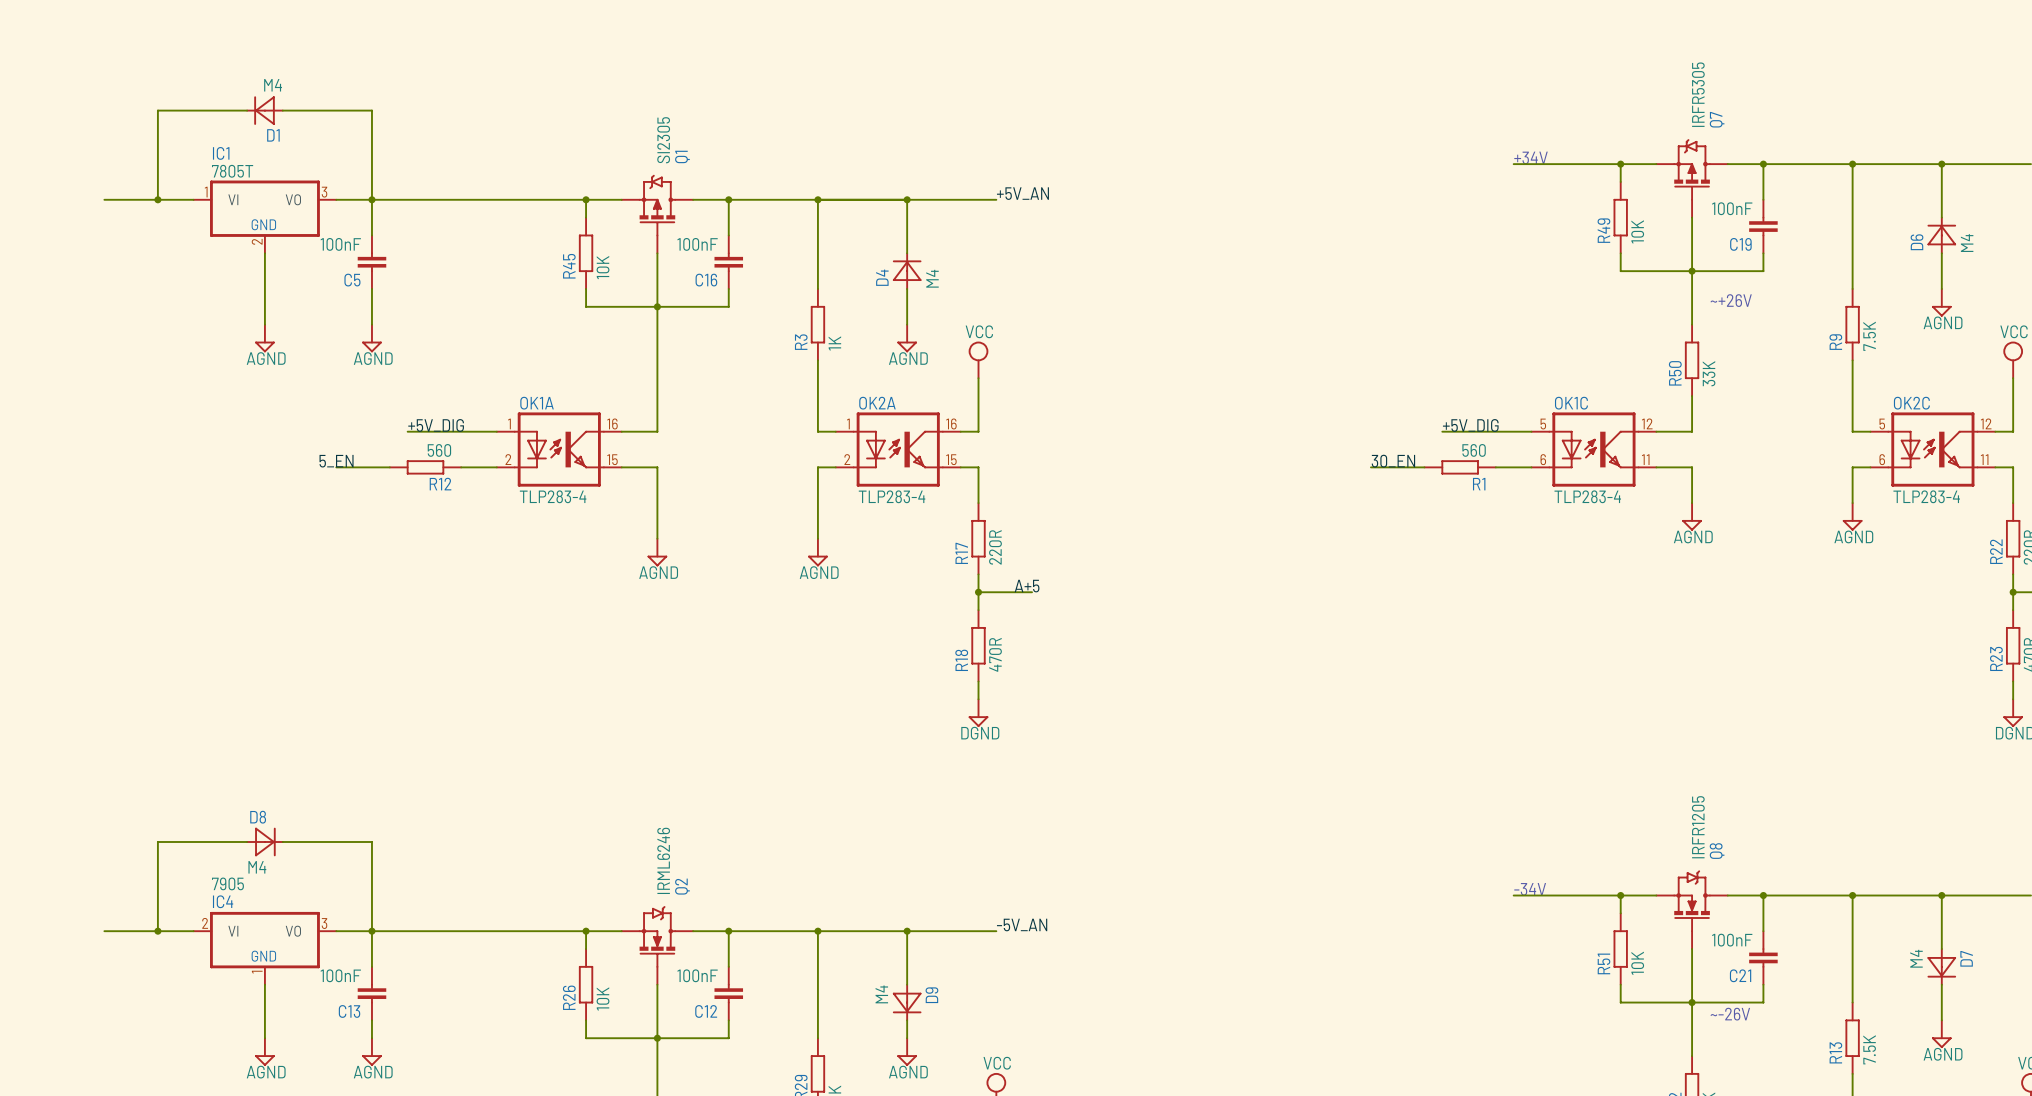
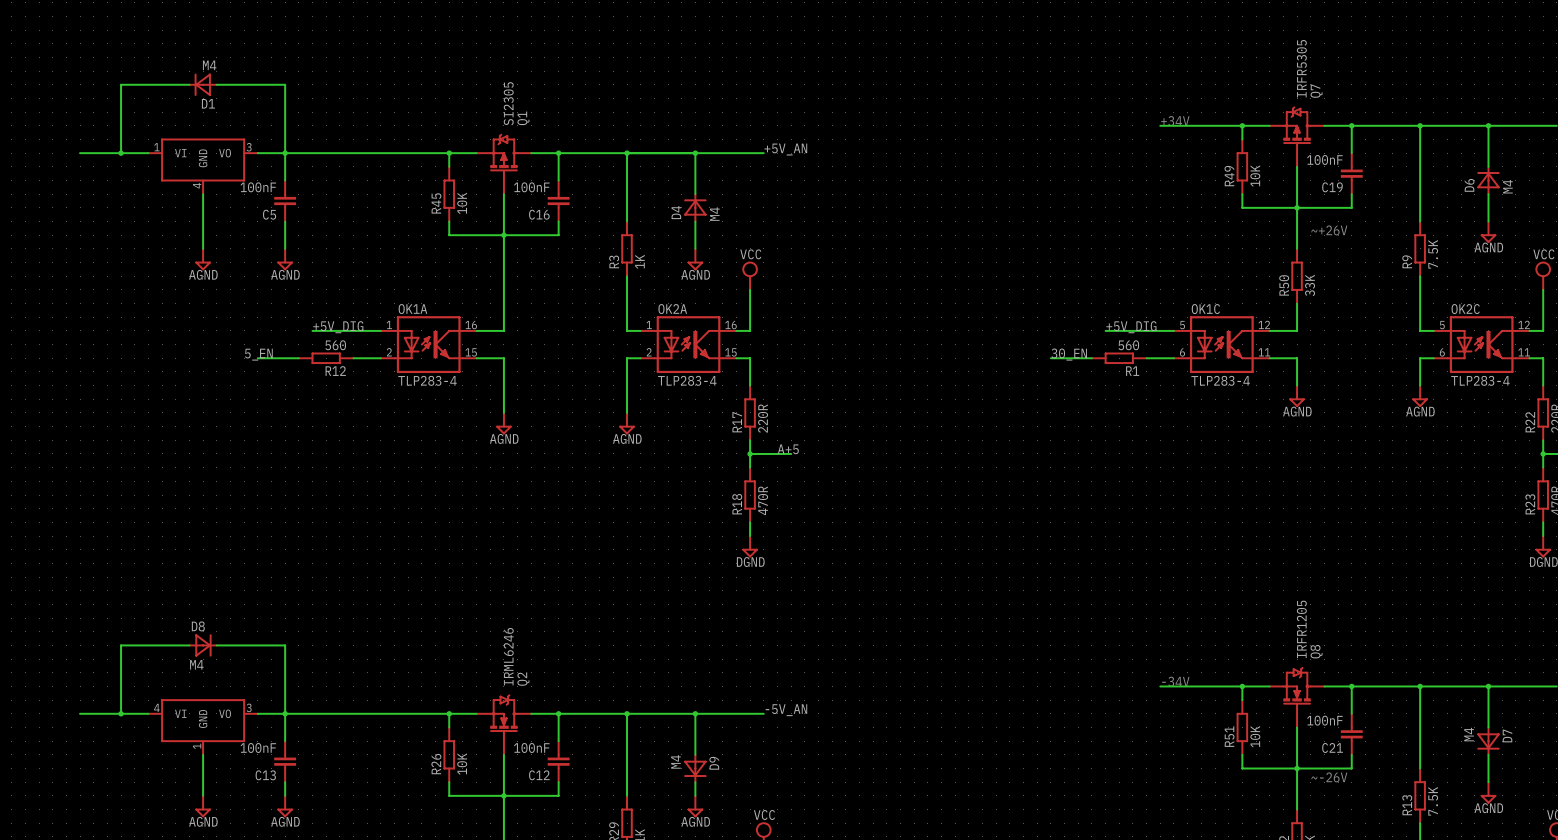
IC1: 7805T (264, 216) -> none
part: none -> (203, 166)
IC4: 7905 (264, 948) -> none
part: none -> (203, 727)

